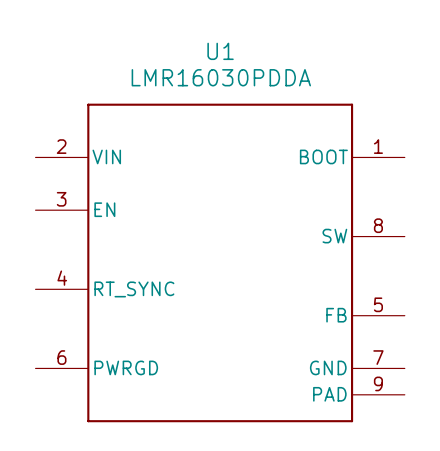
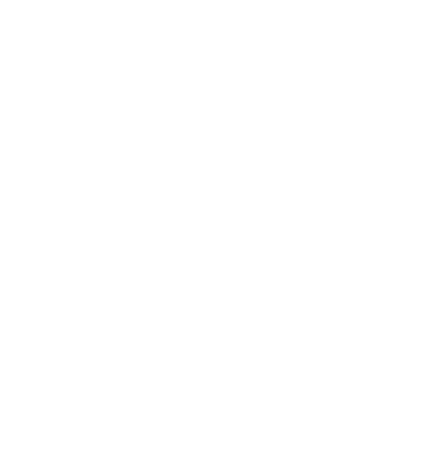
U1: LMR16030PDDA (220, 262) -> none

